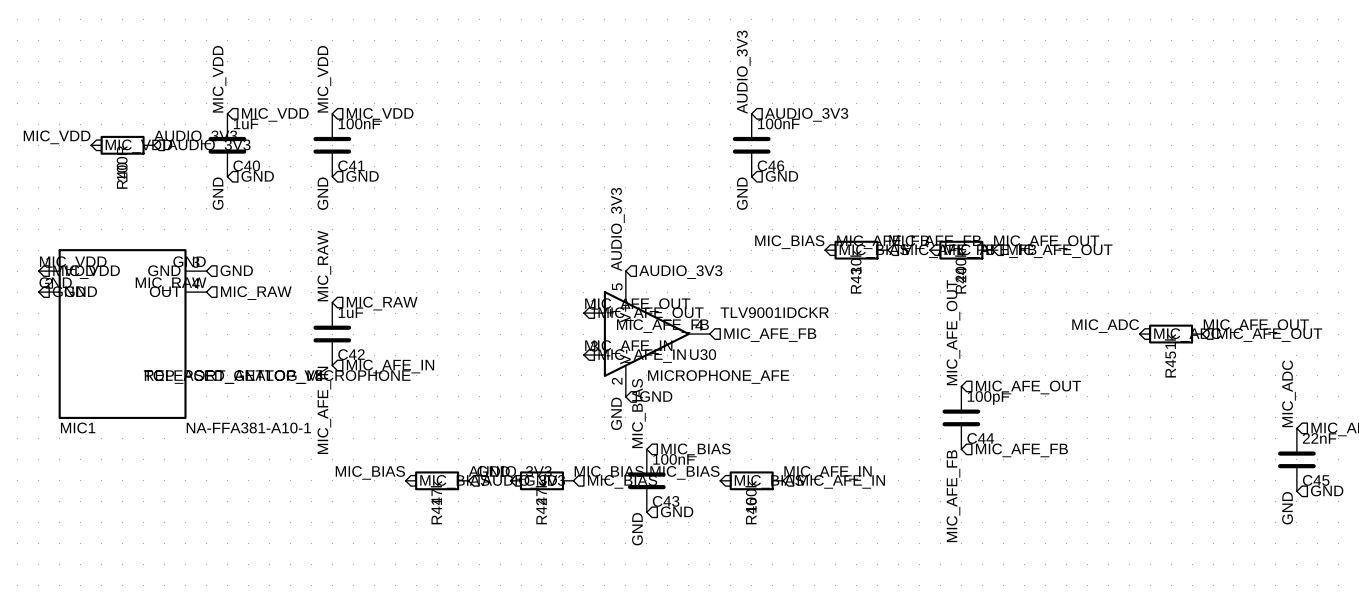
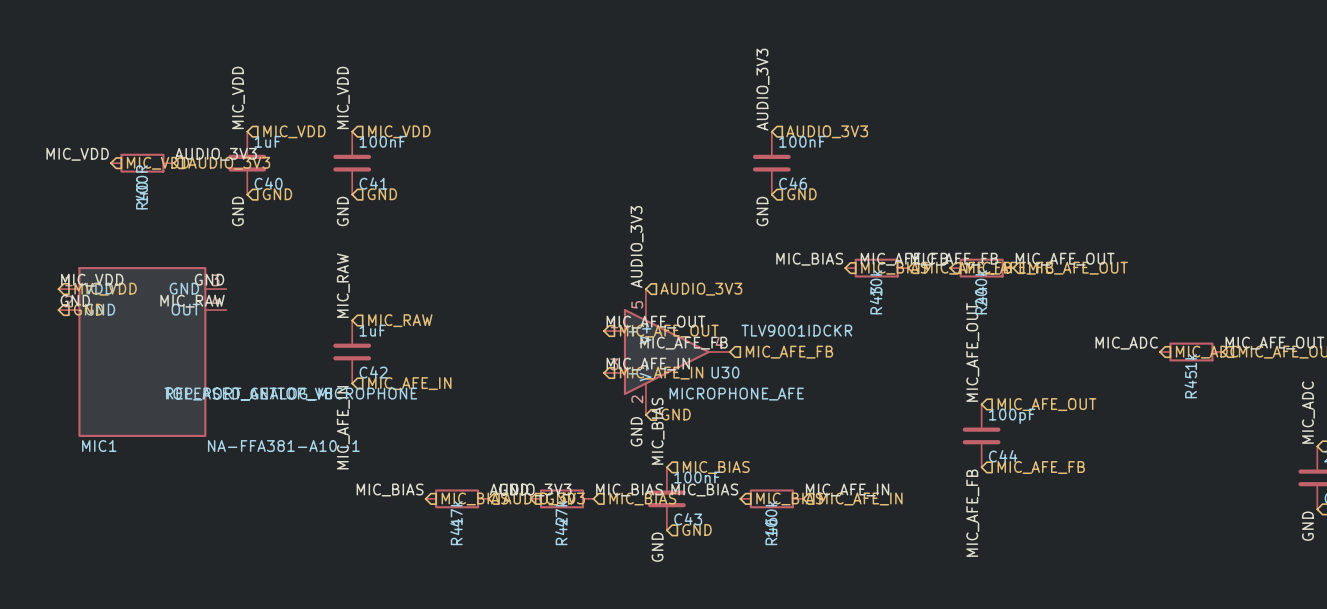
hierarchical label: GND (236, 270) -> none
hierarchical label: MIC_RAW (256, 293) -> none

